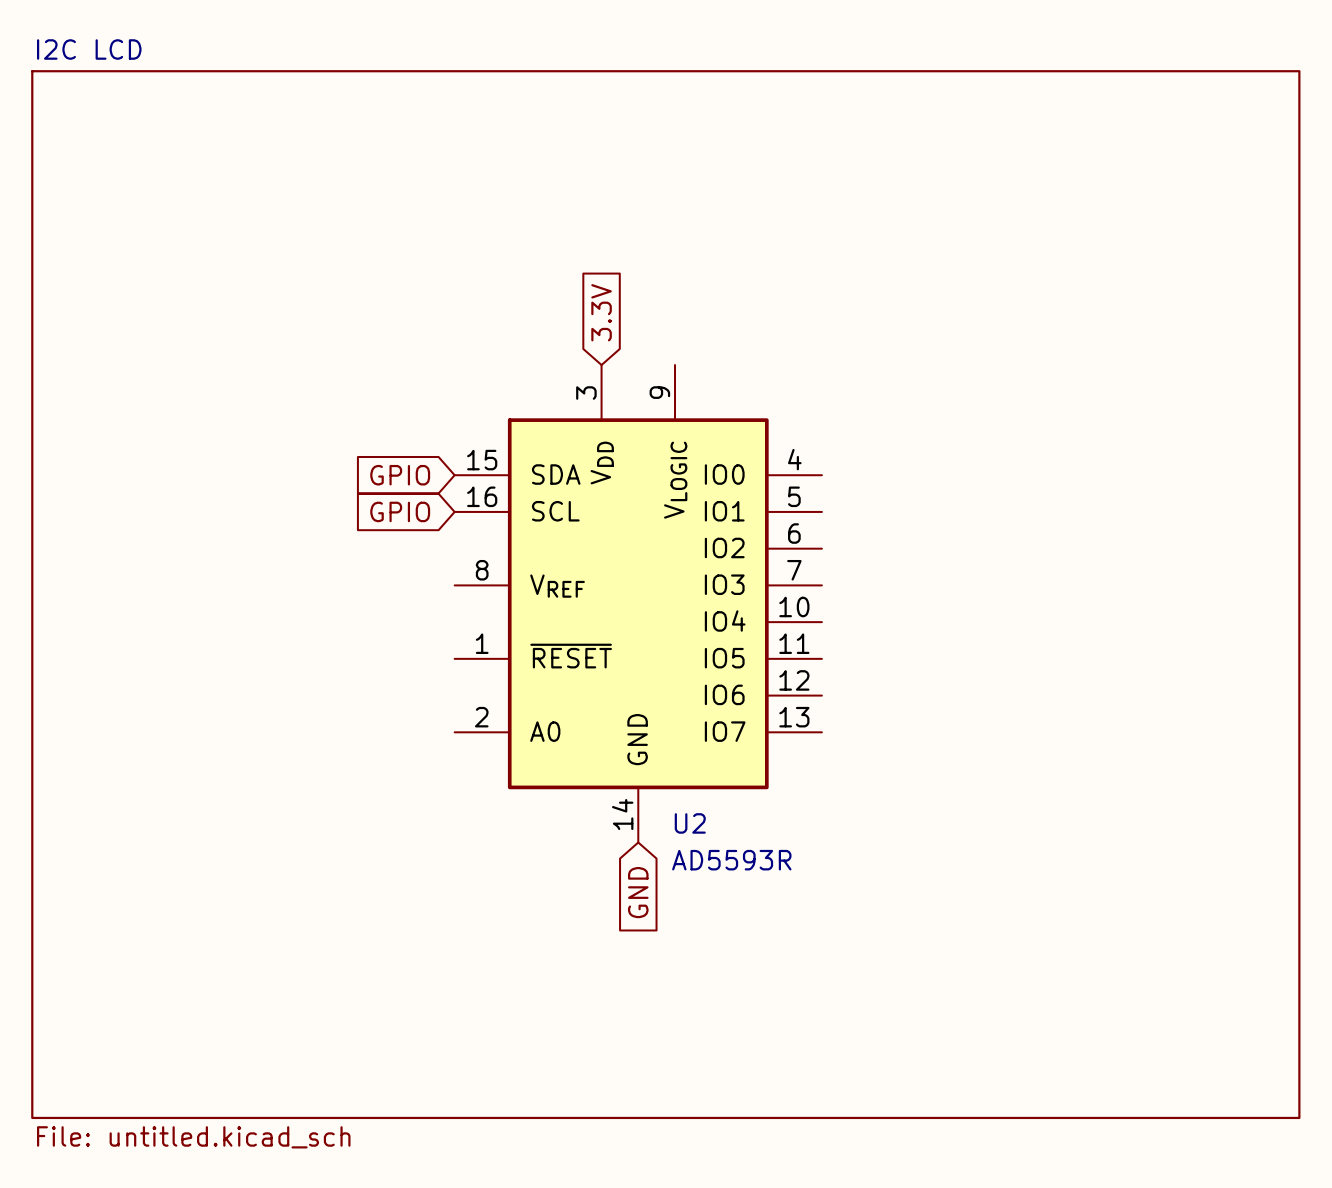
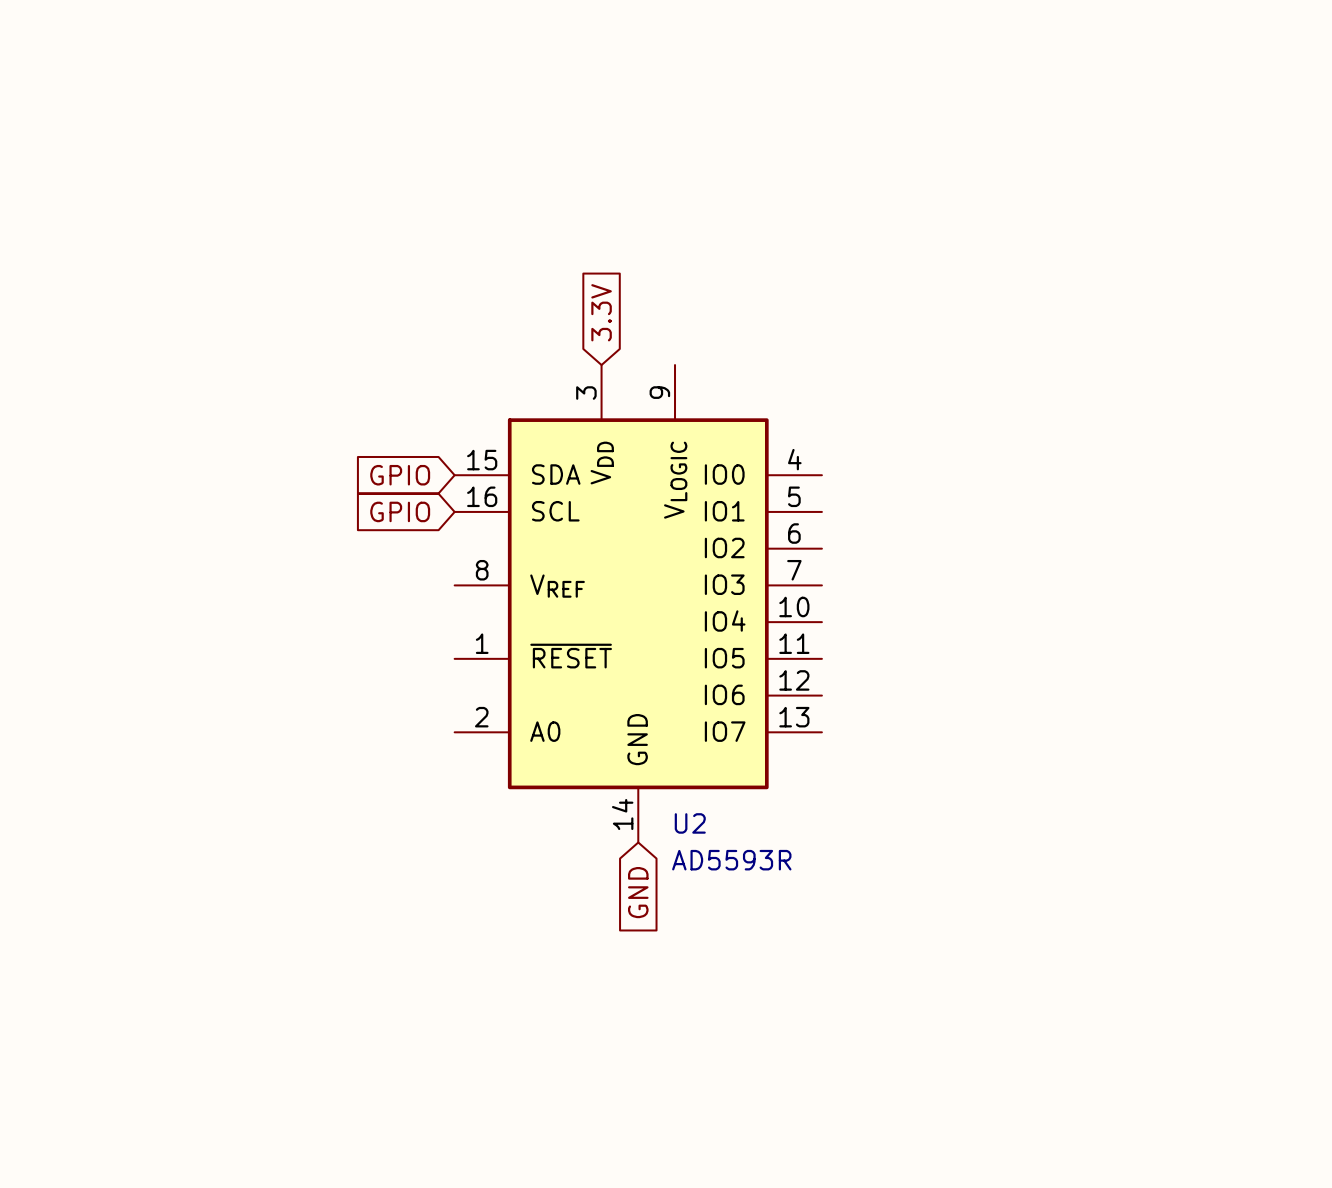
sheet I2C LCD: File: untitled.kicad_sch (665, 594) -> none

